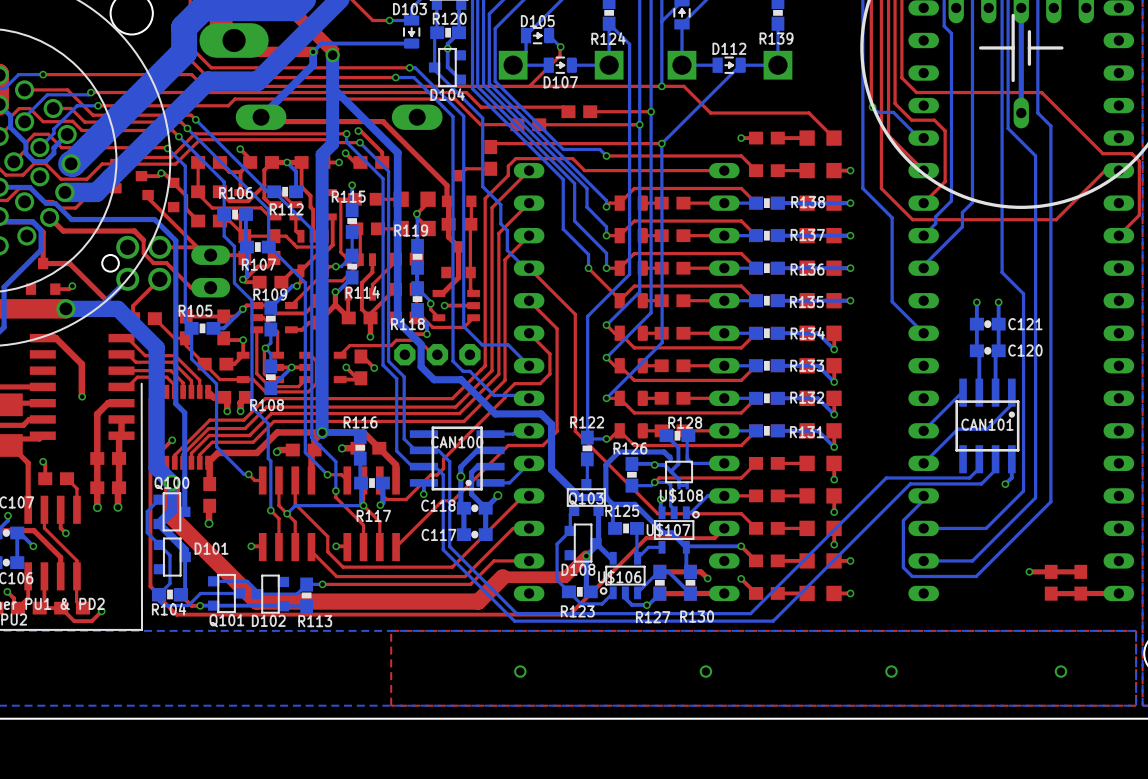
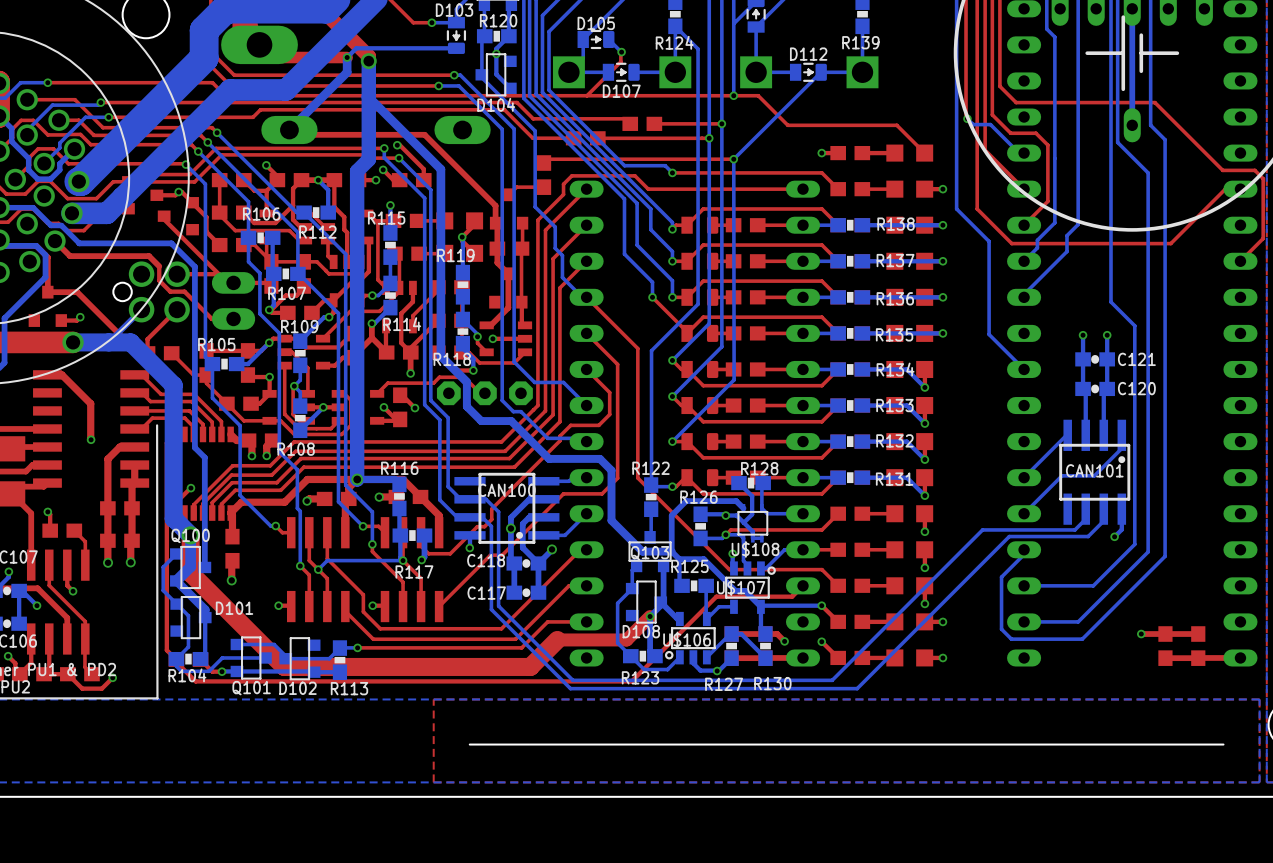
via: (520, 671) -> none
via: (705, 671) -> none
via: (891, 671) -> none
via: (1060, 671) -> none
board edge: none -> (1223, 744) (469, 744)

